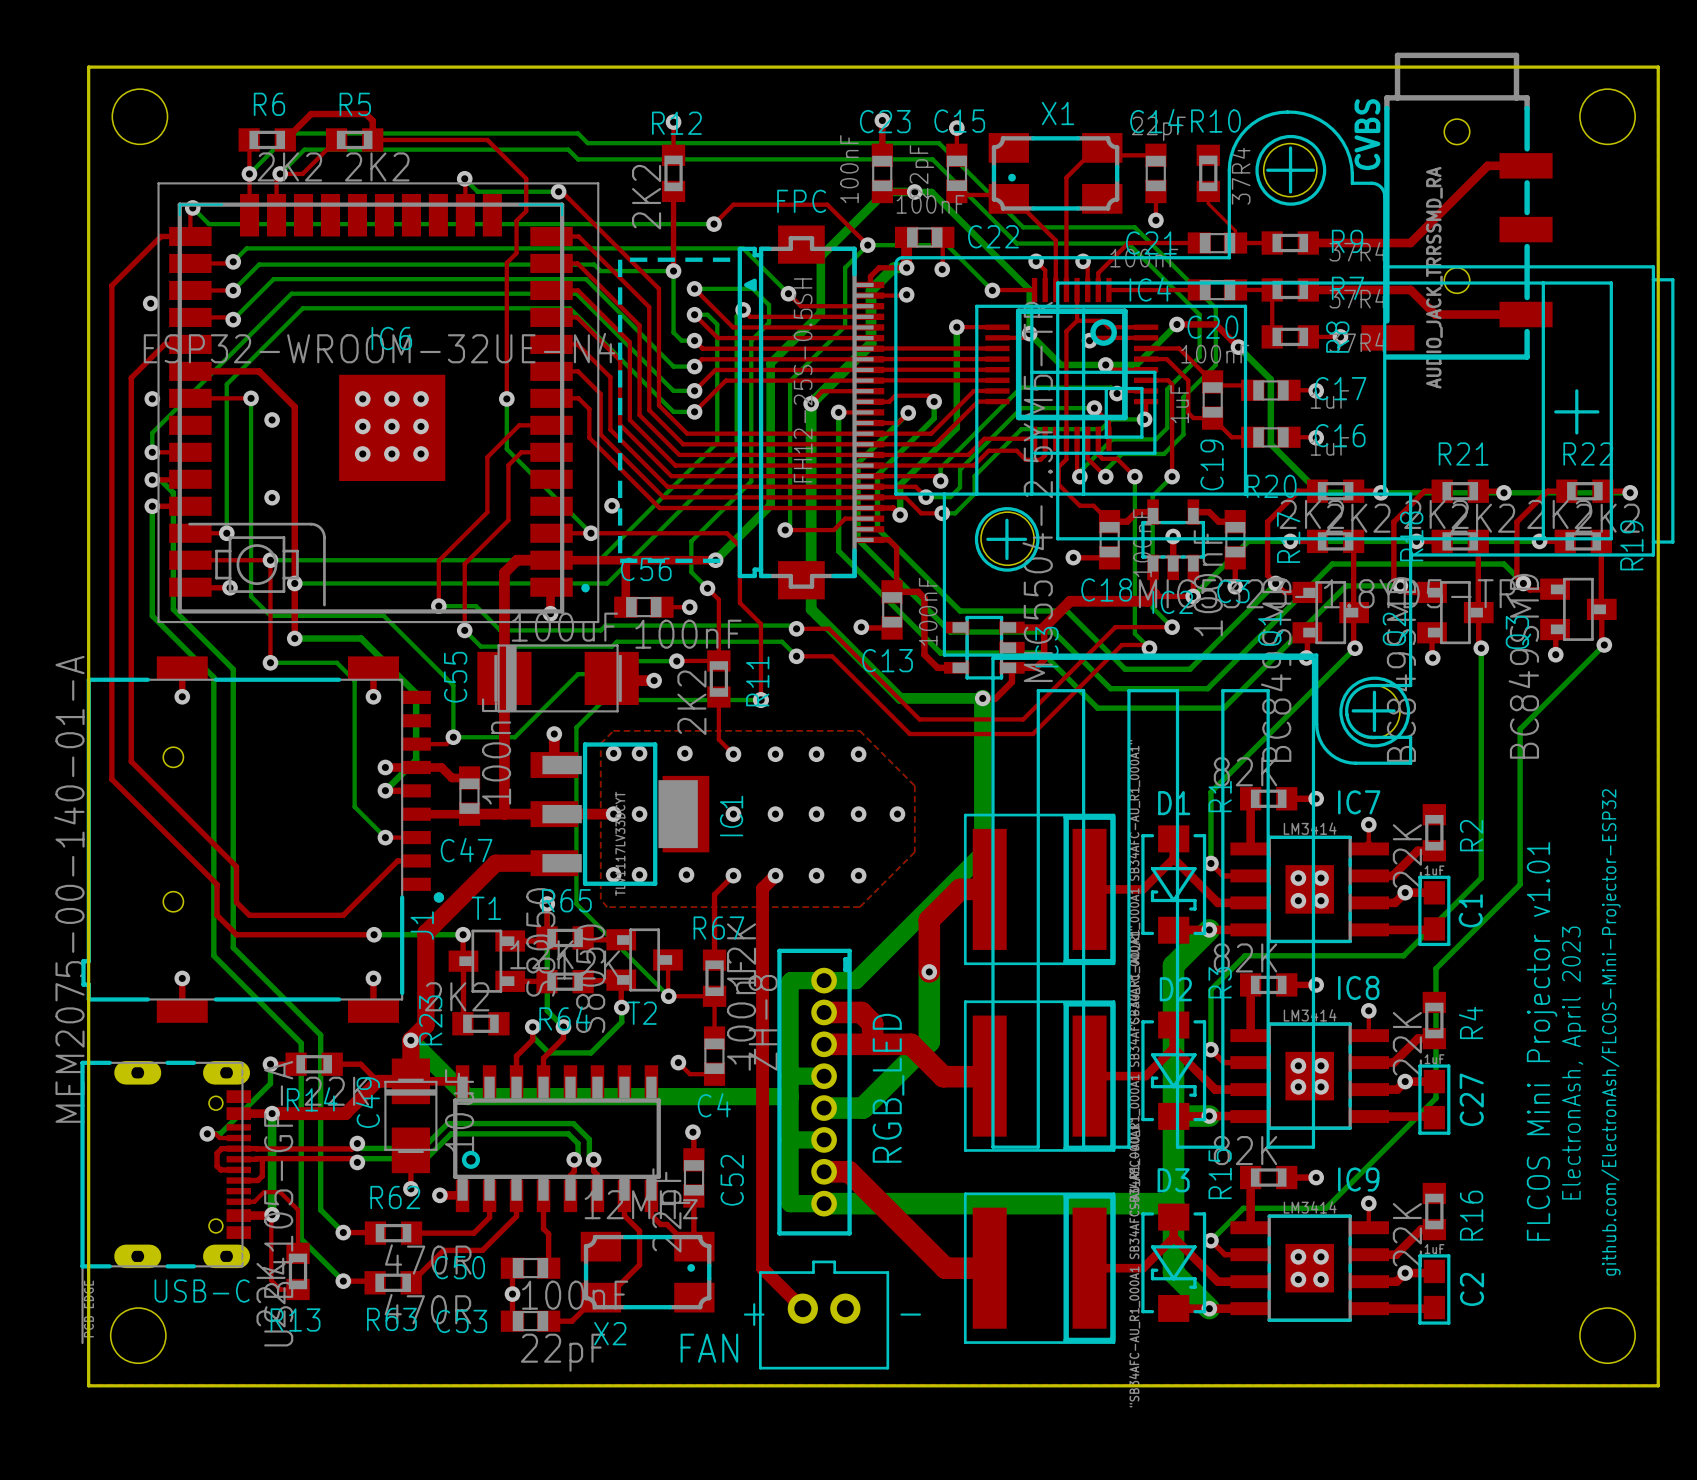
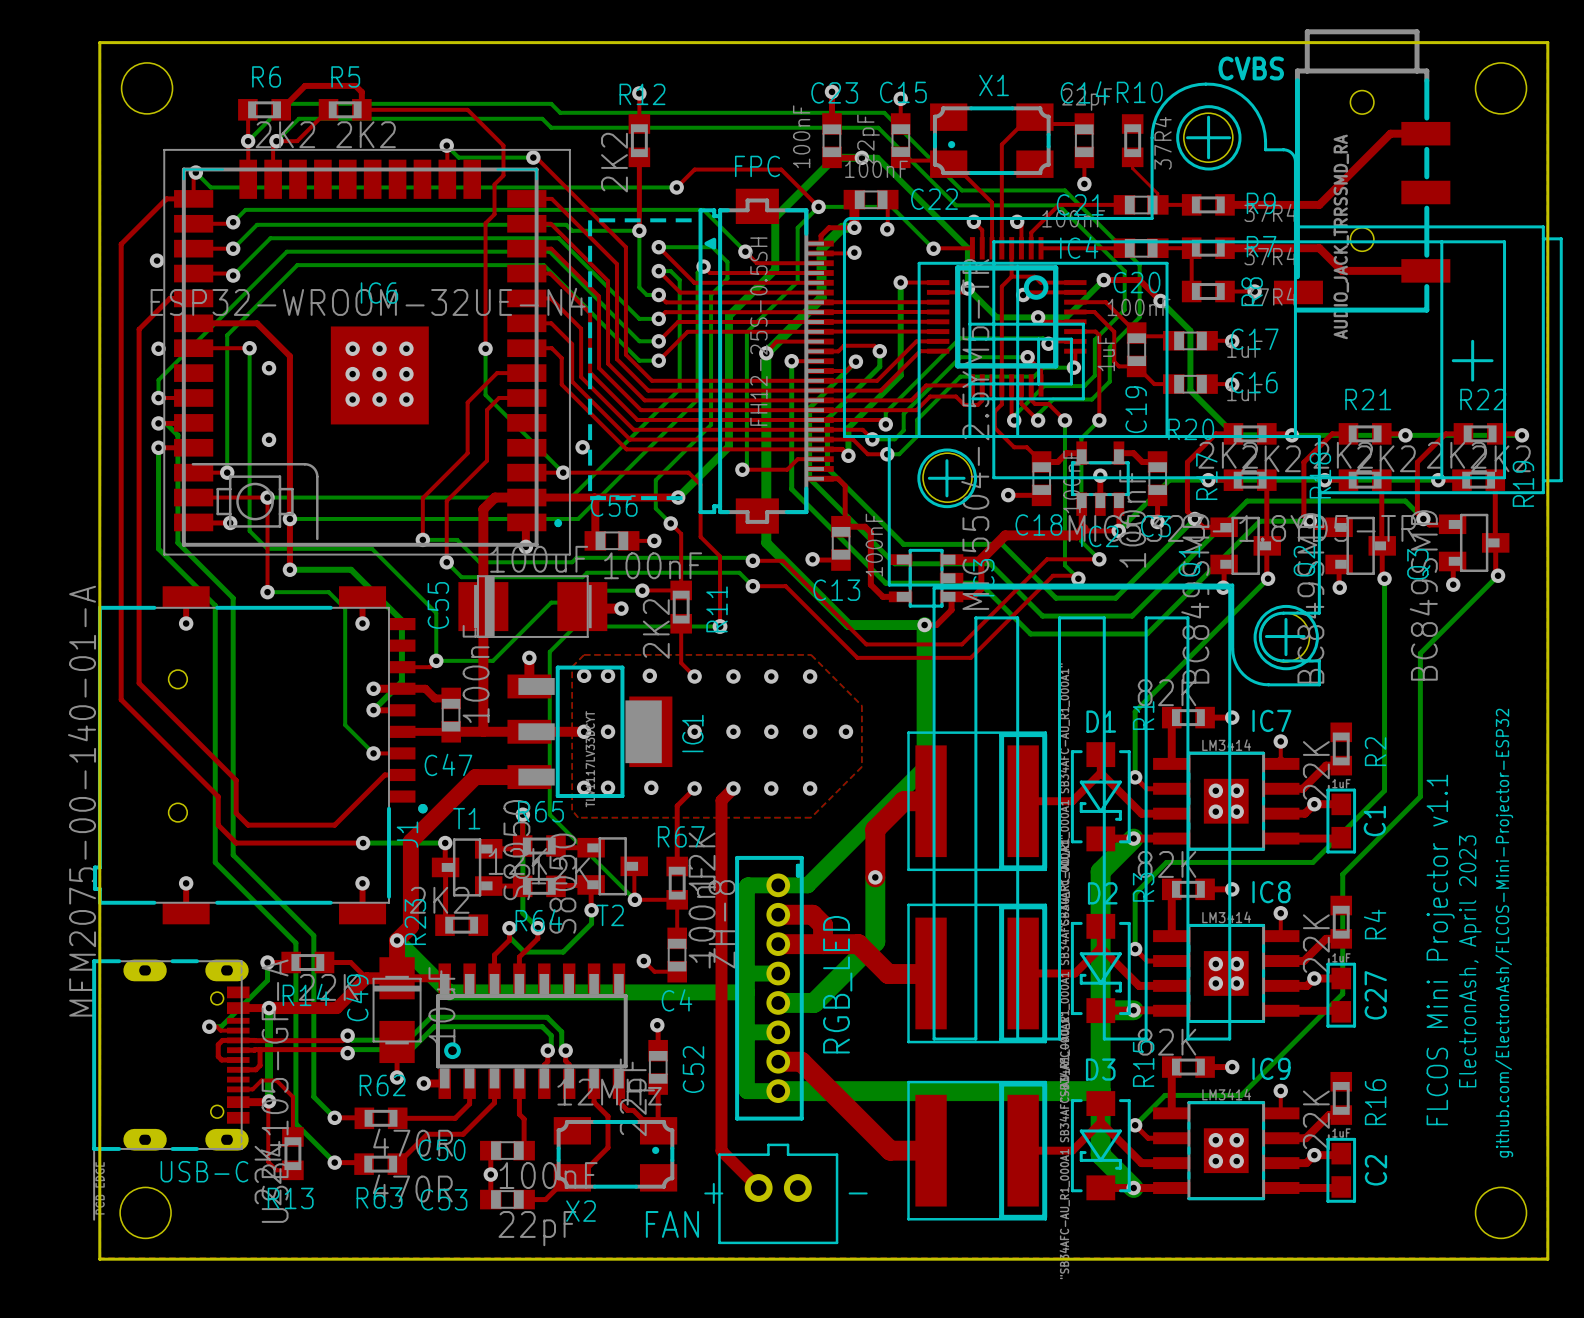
CVBS name rotation: 0° (1367, 134) -> 90° clockwise (1251, 68)
text: FLCOS Mini Projector v1.01 (1542, 1041) -> FLCOS Mini Projector v1.1 (1440, 949)

